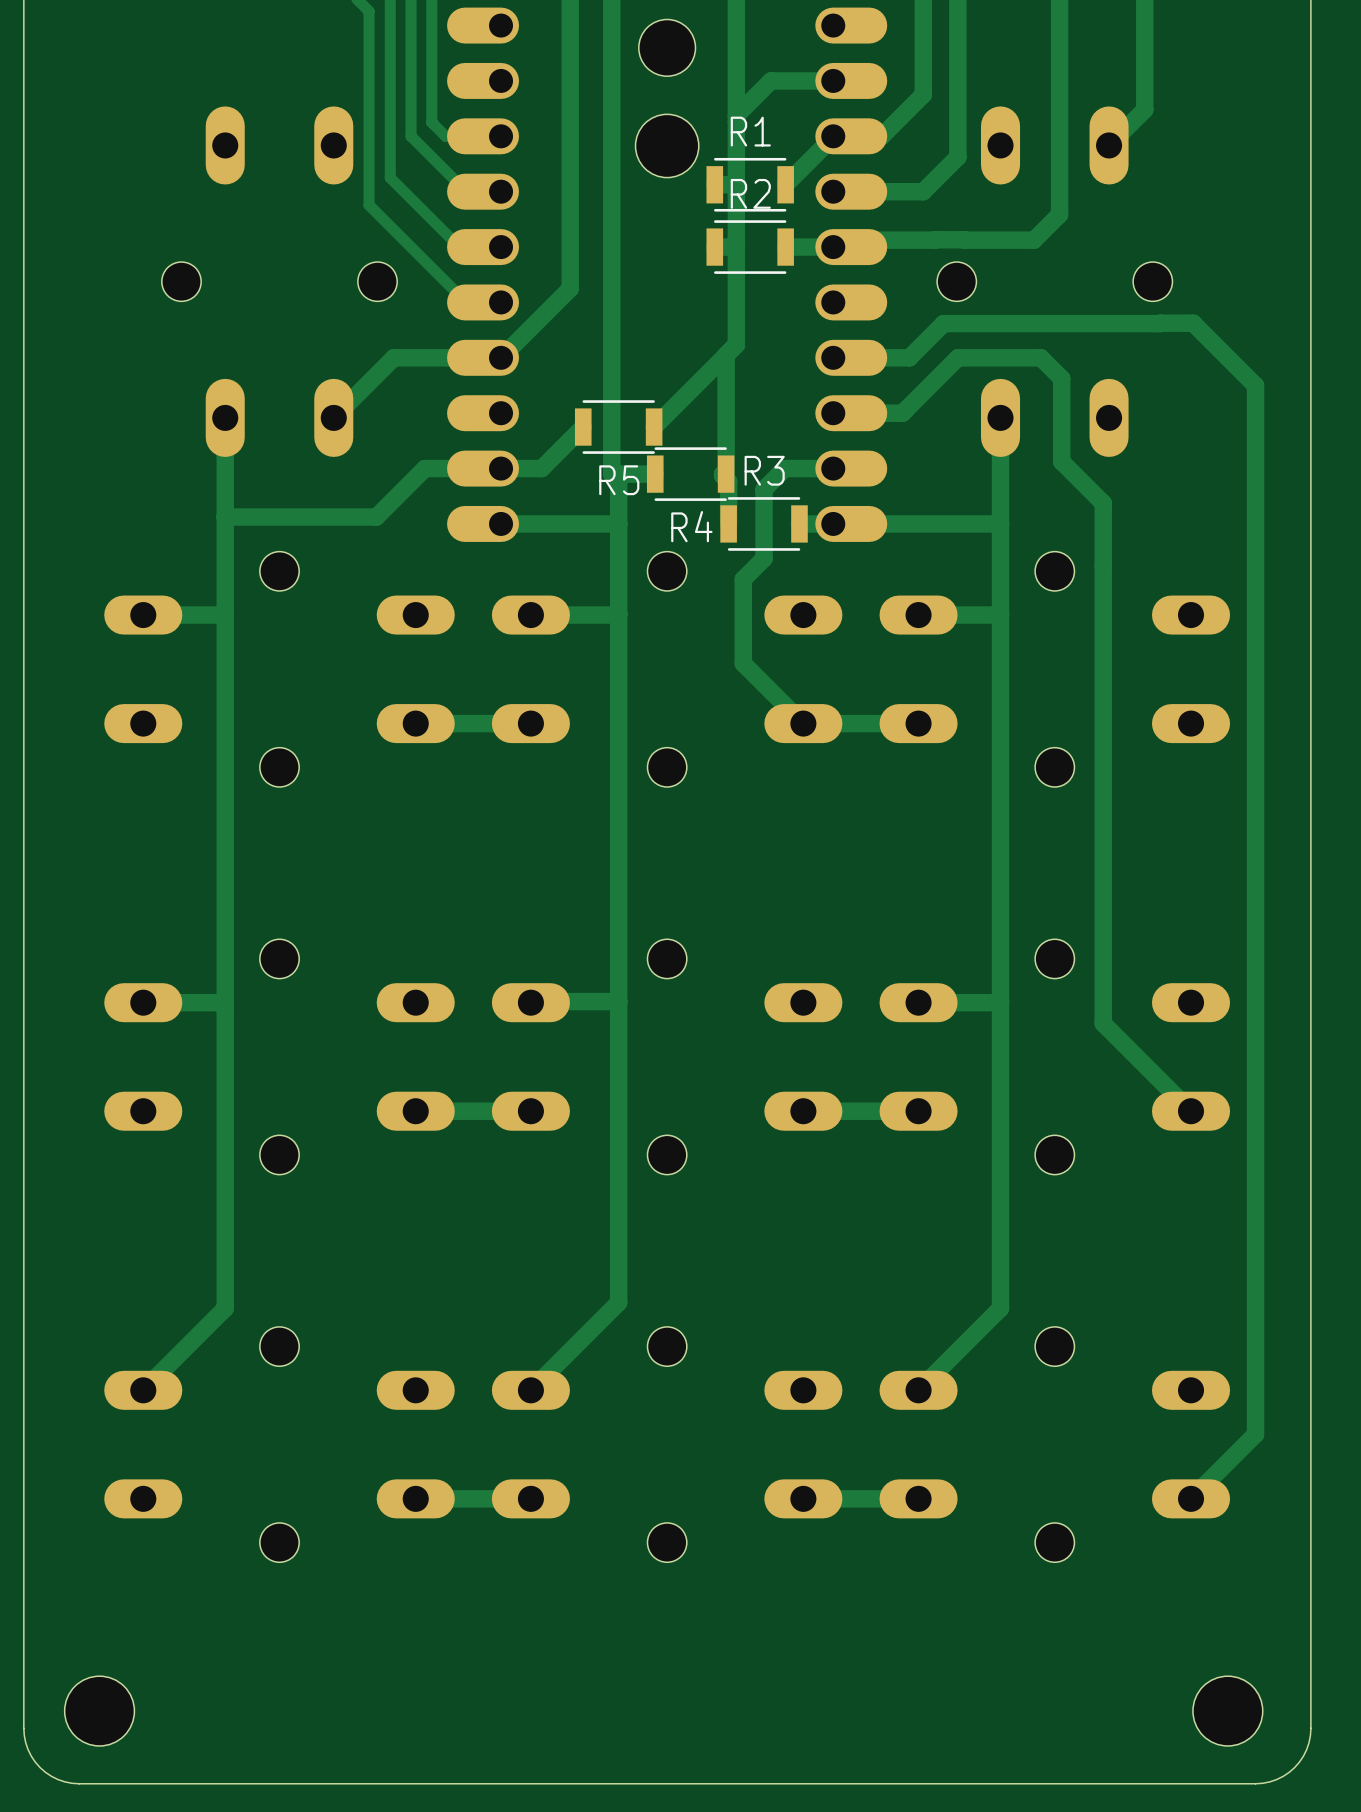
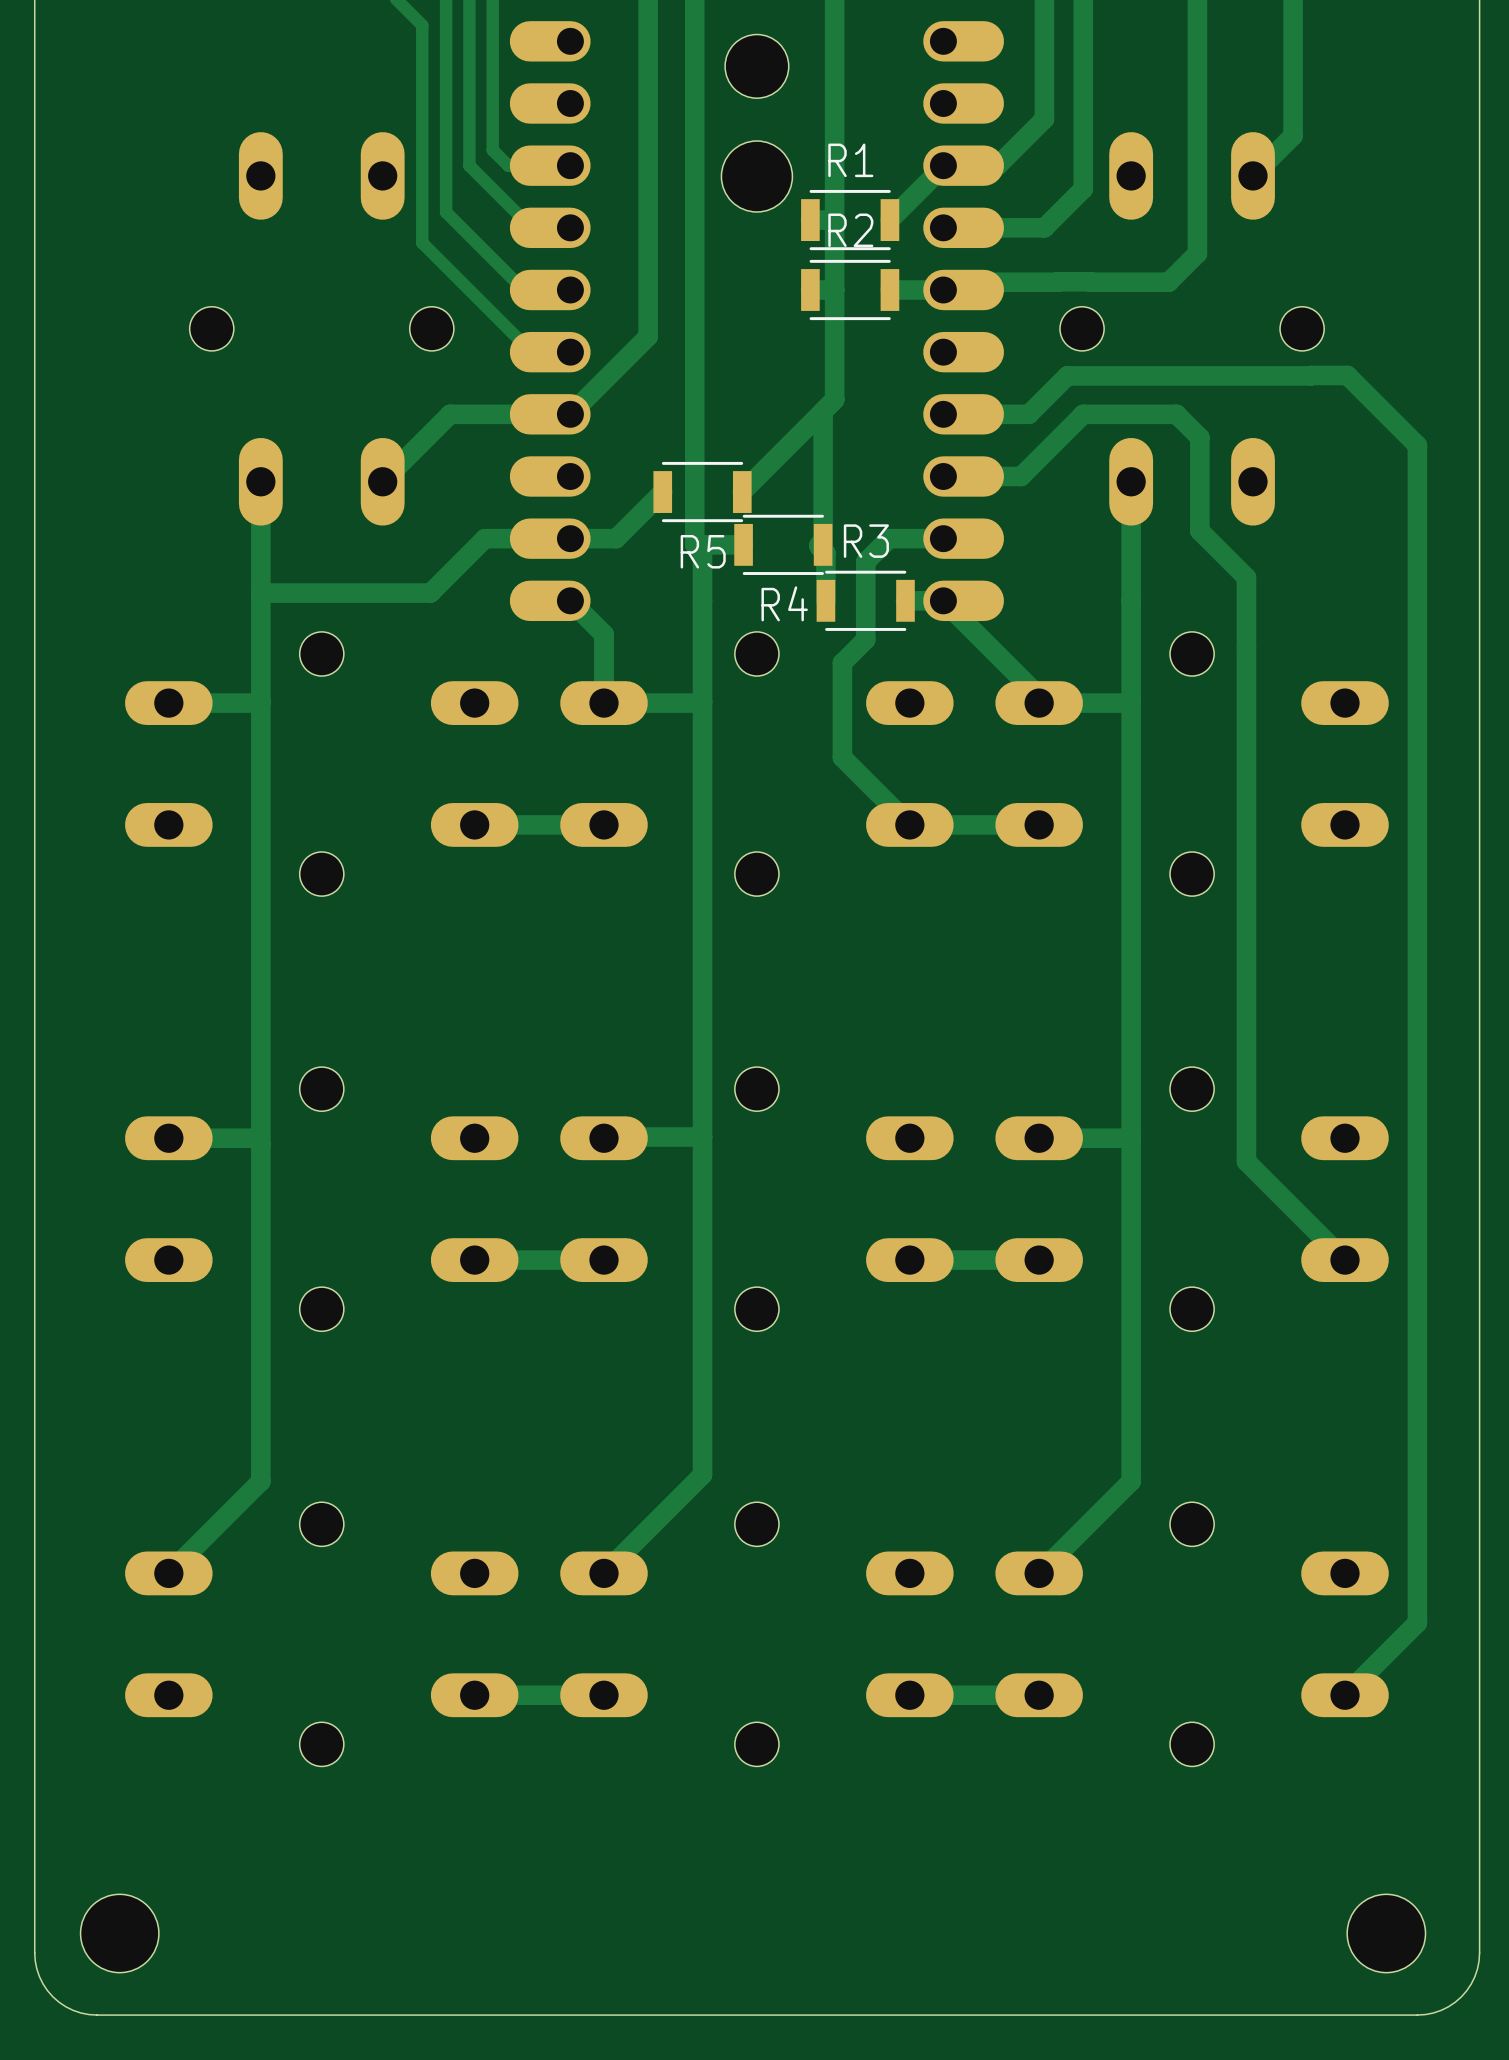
track: (833, 80) (770, 80) (736, 115) -> none
track: (618, 523) (501, 523) -> (603, 703) (603, 634) (570, 600)
track: (1000, 523) (833, 523) -> (1039, 703) (1039, 696) (943, 600)

